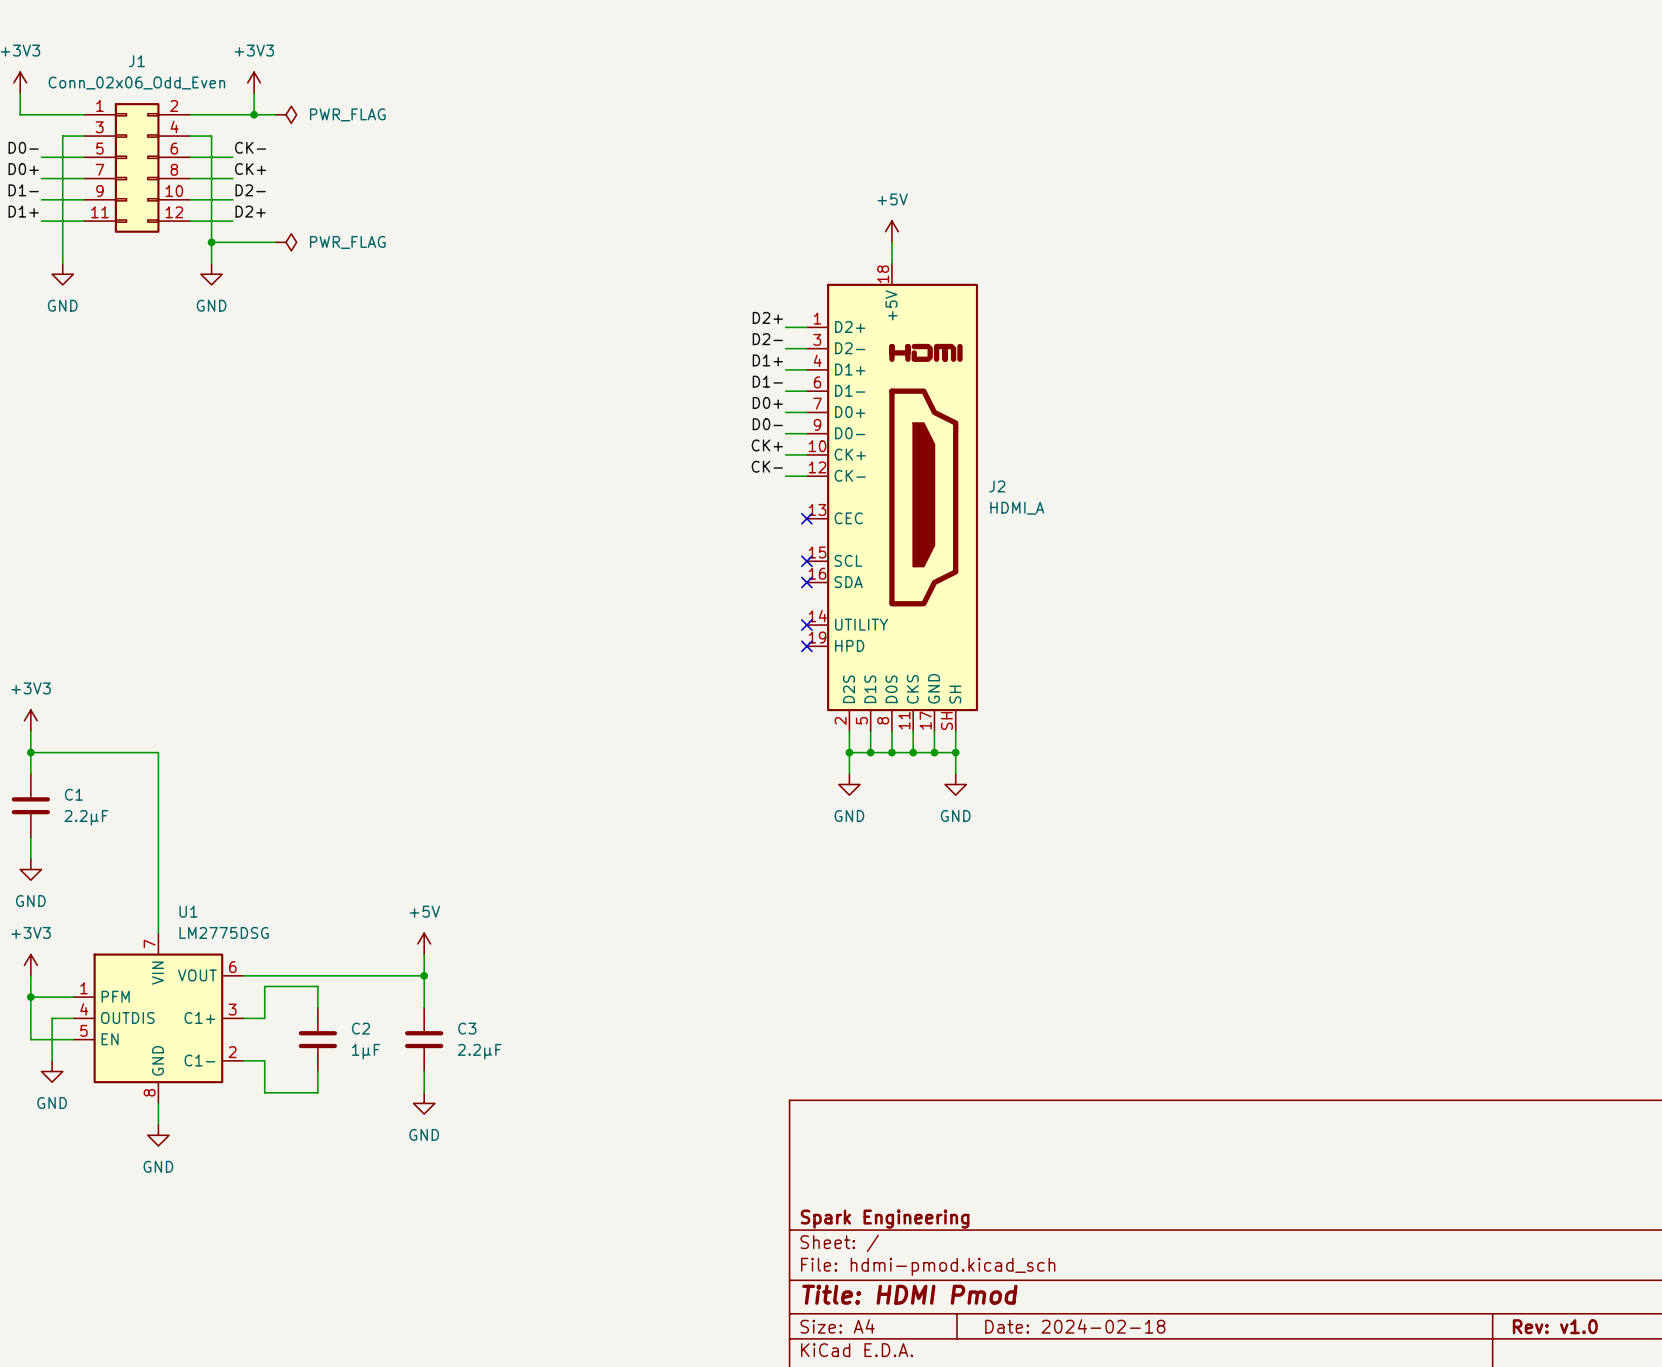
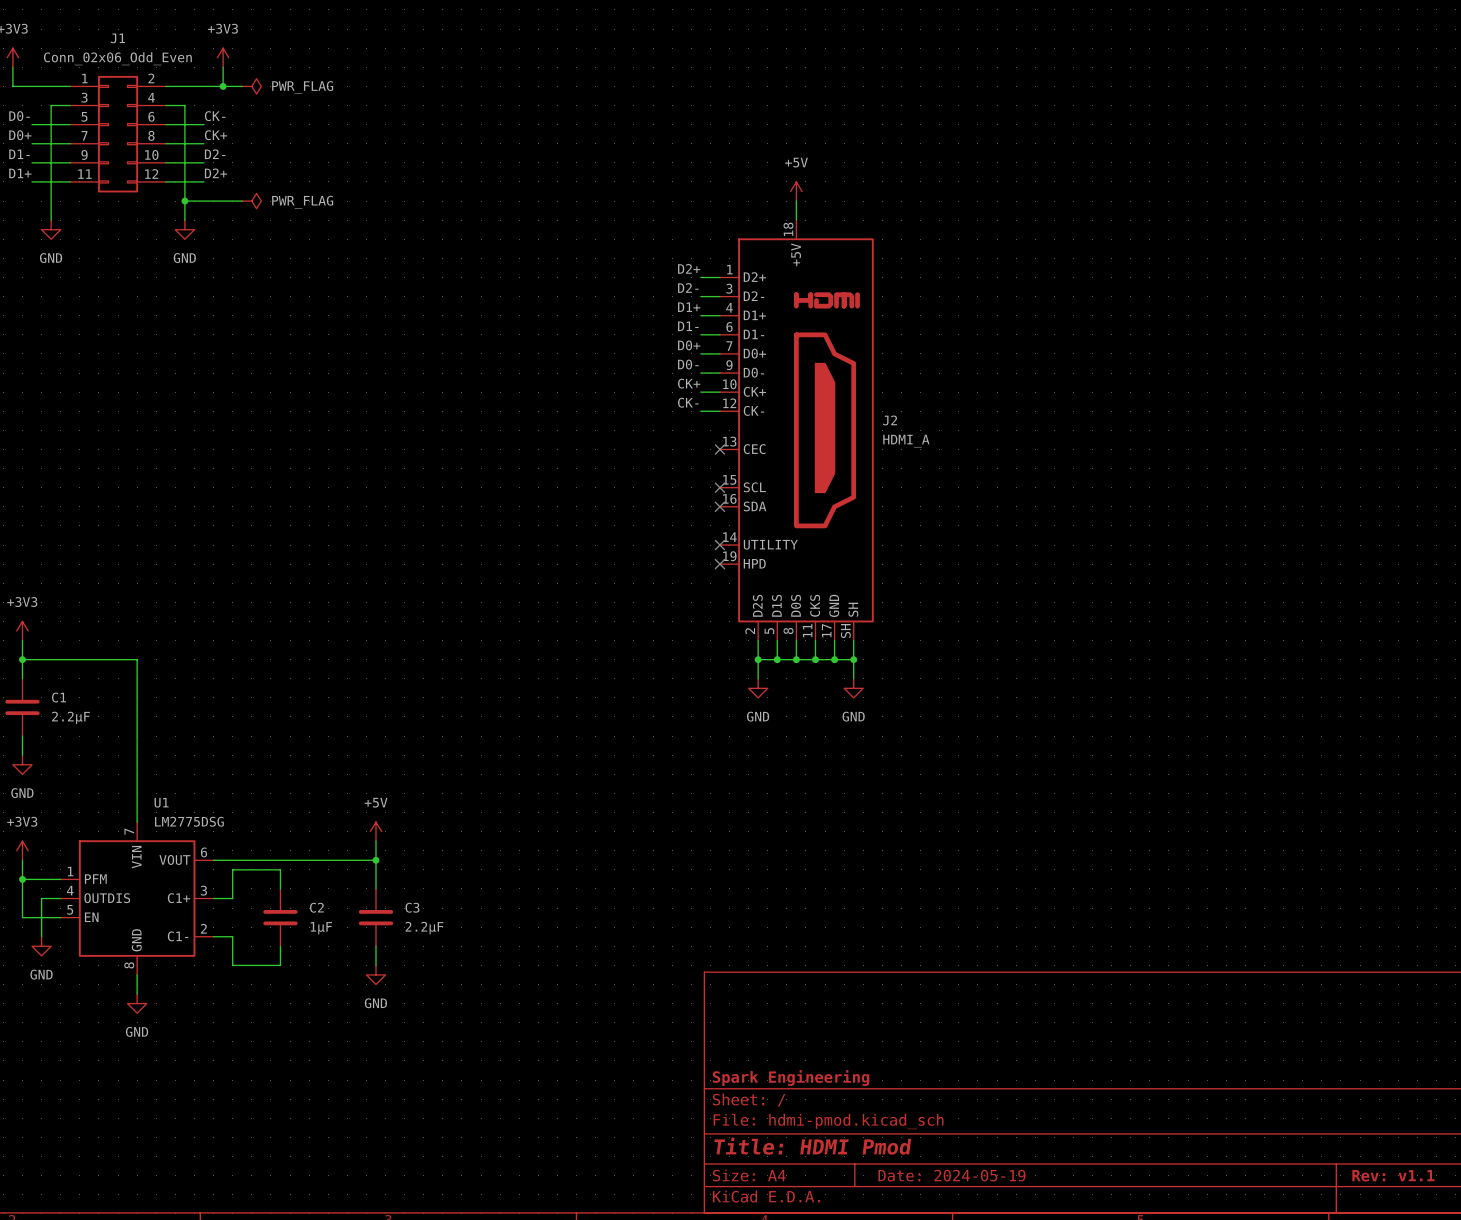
title block: Date: 2024-02-18 (1075, 1326) -> Date: 2024-05-19 (951, 1175)
title block: Rev: v1.0 (1555, 1326) -> Rev: v1.1 (1393, 1175)

